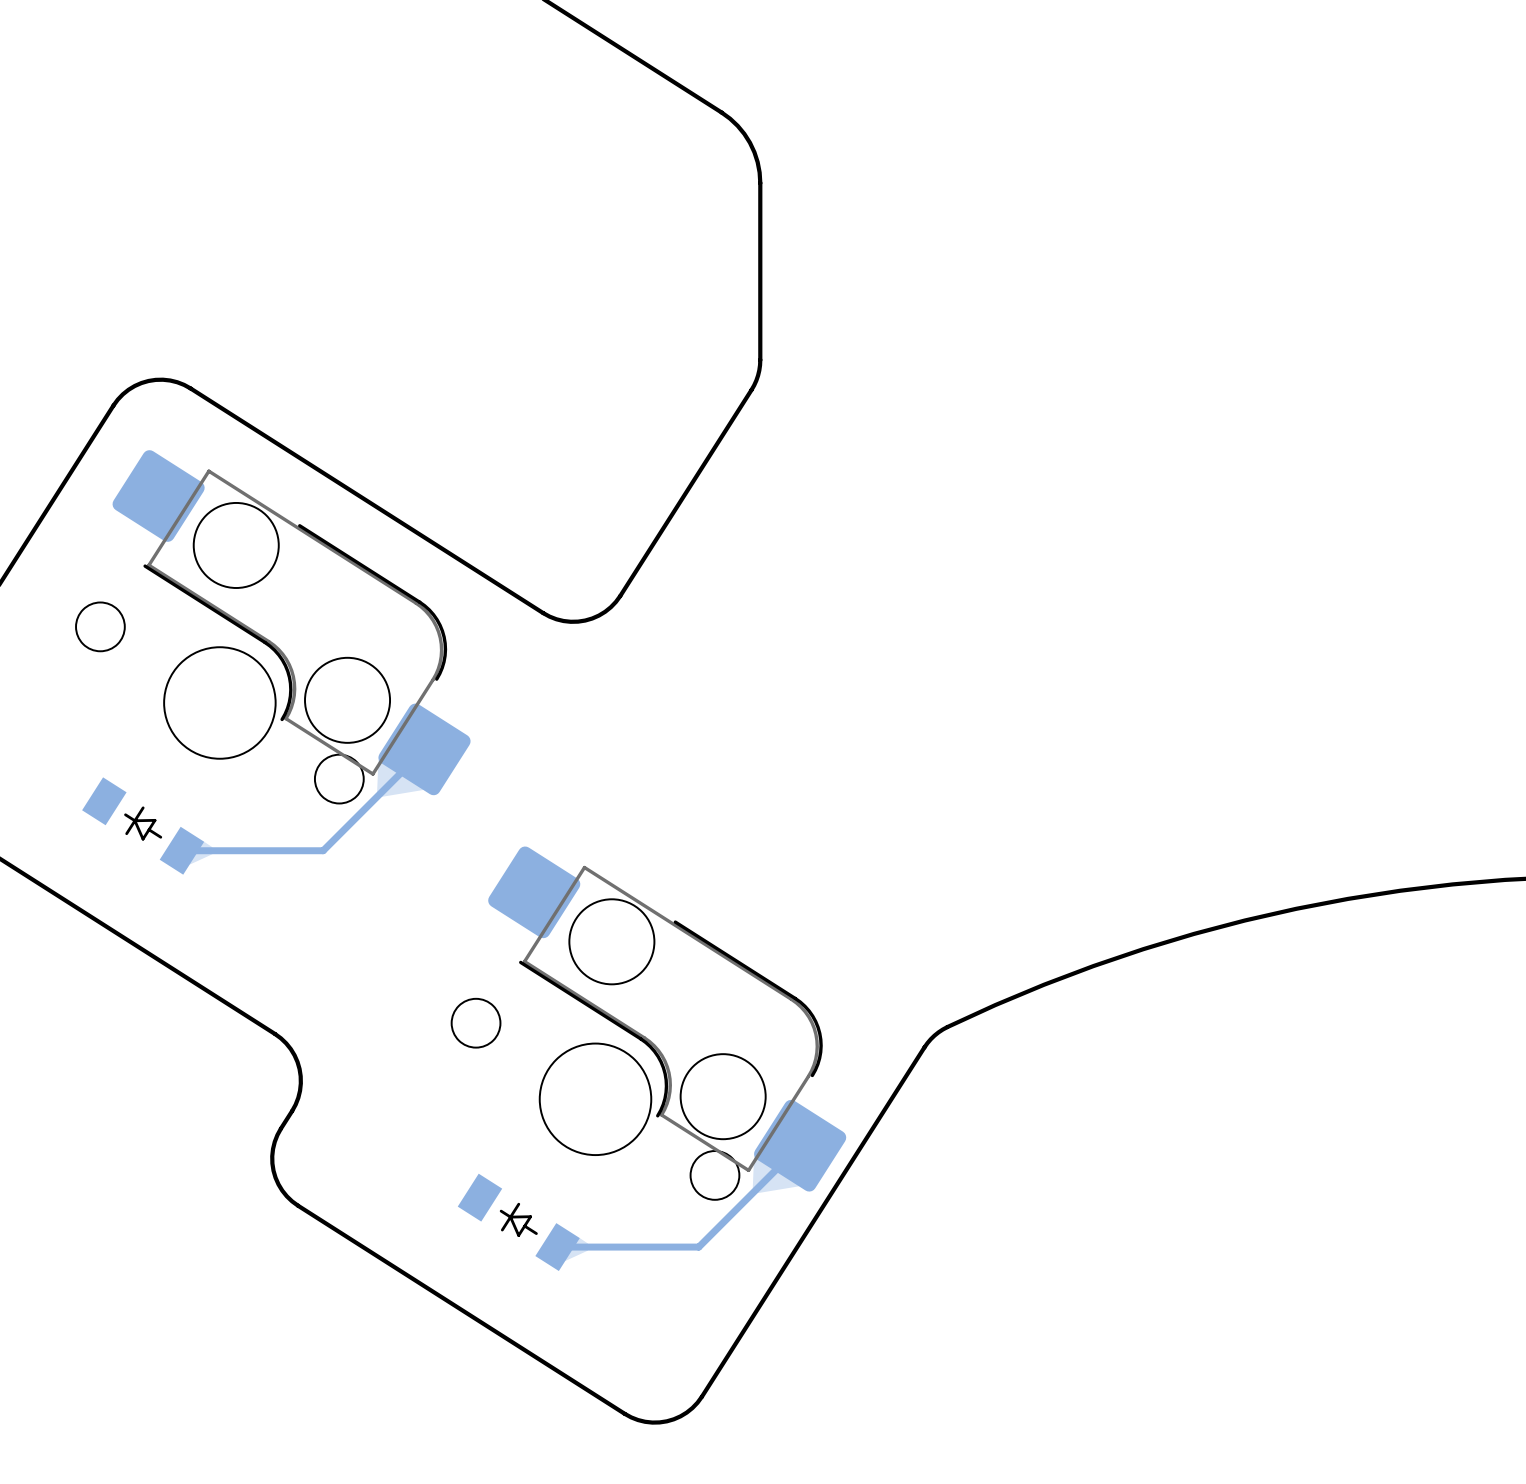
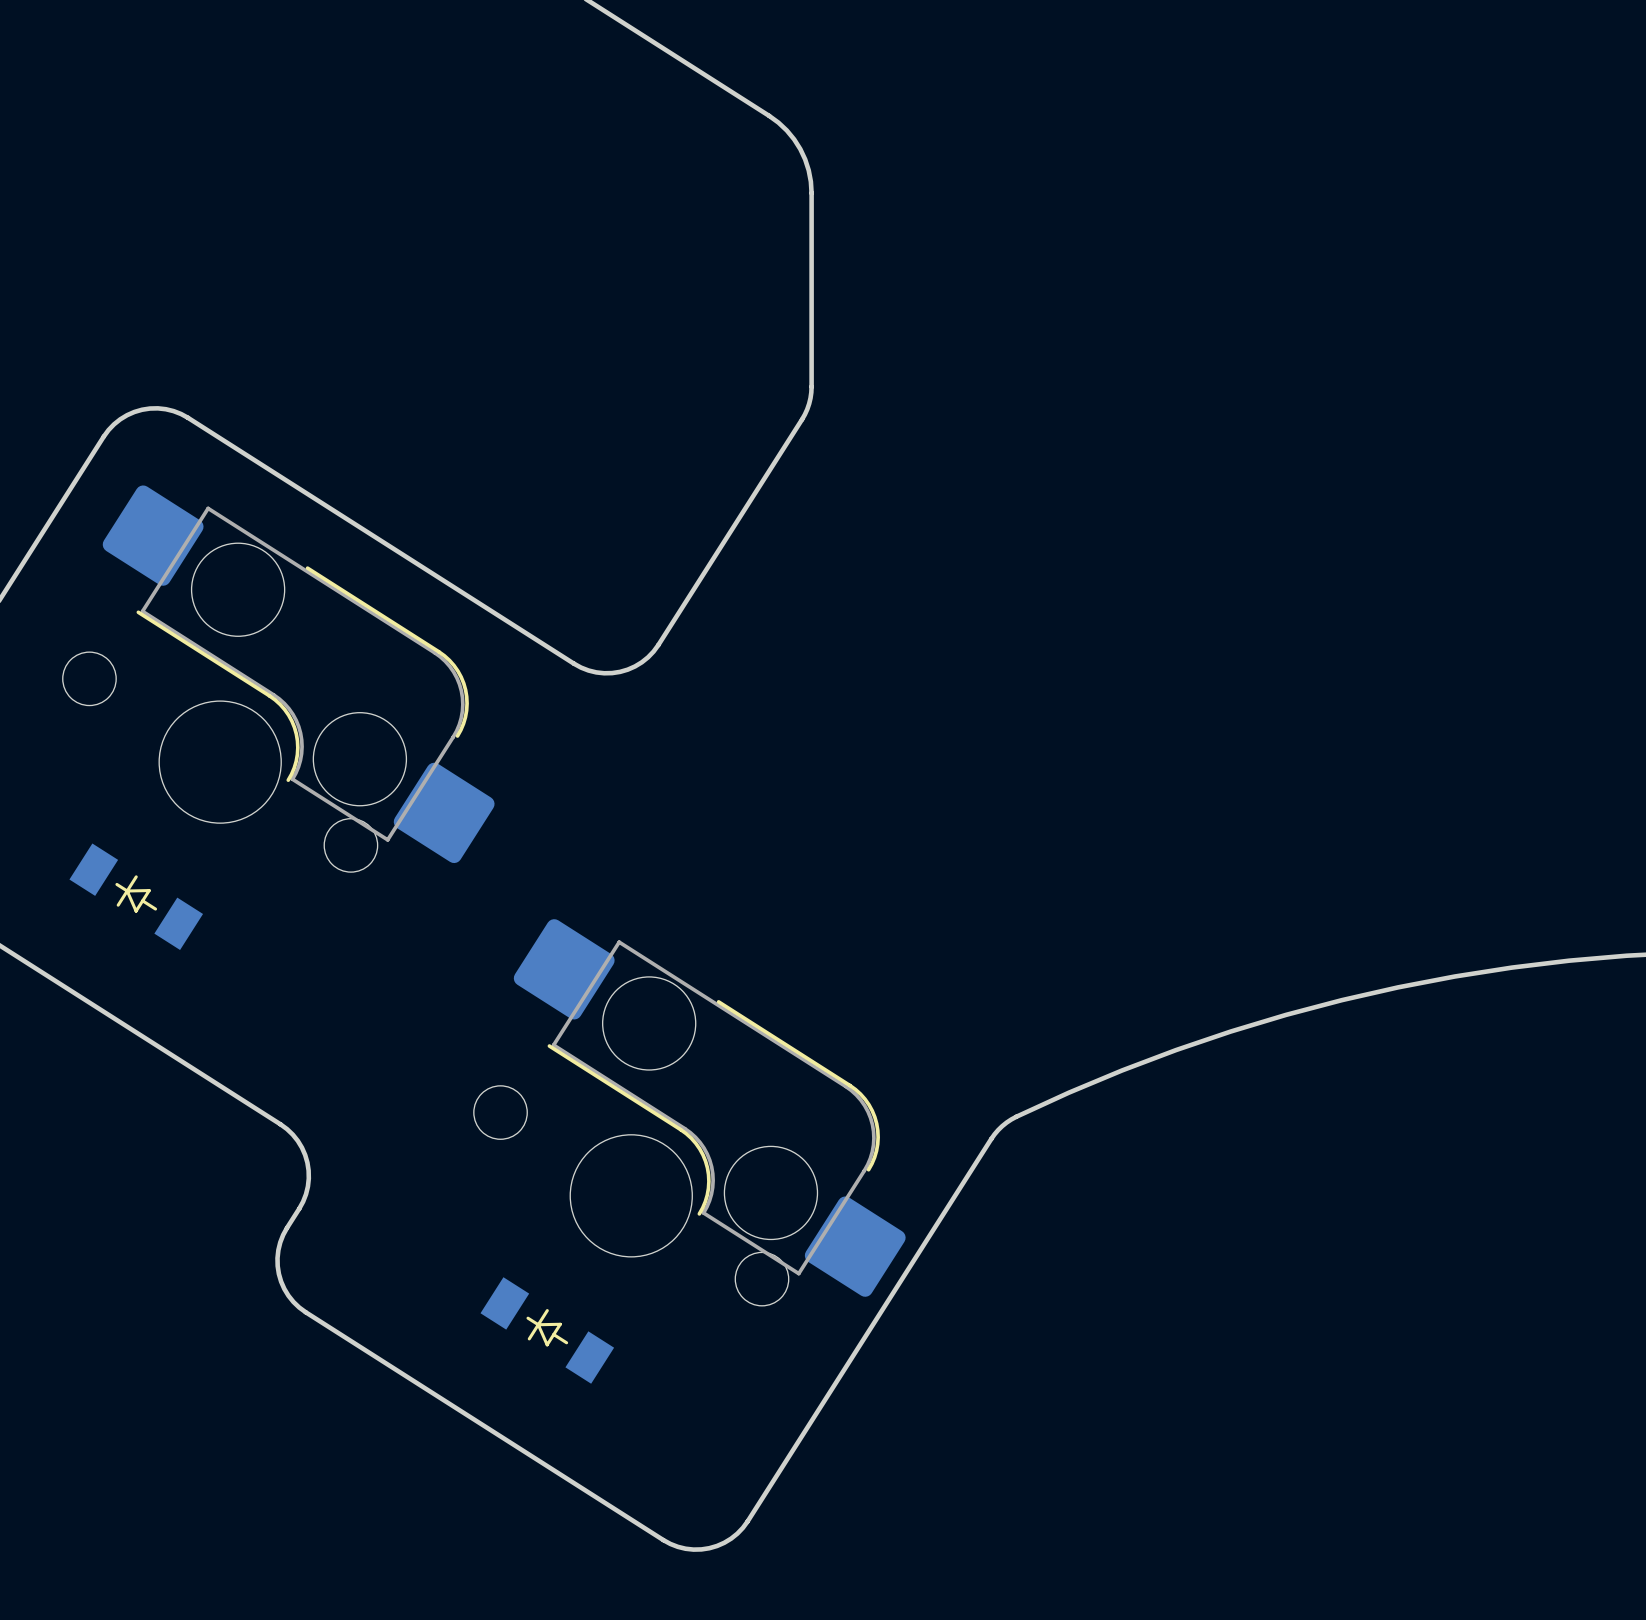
track: (424, 749) (323, 850) (181, 850) -> none
track: (800, 1145) (698, 1247) (557, 1247) -> none

